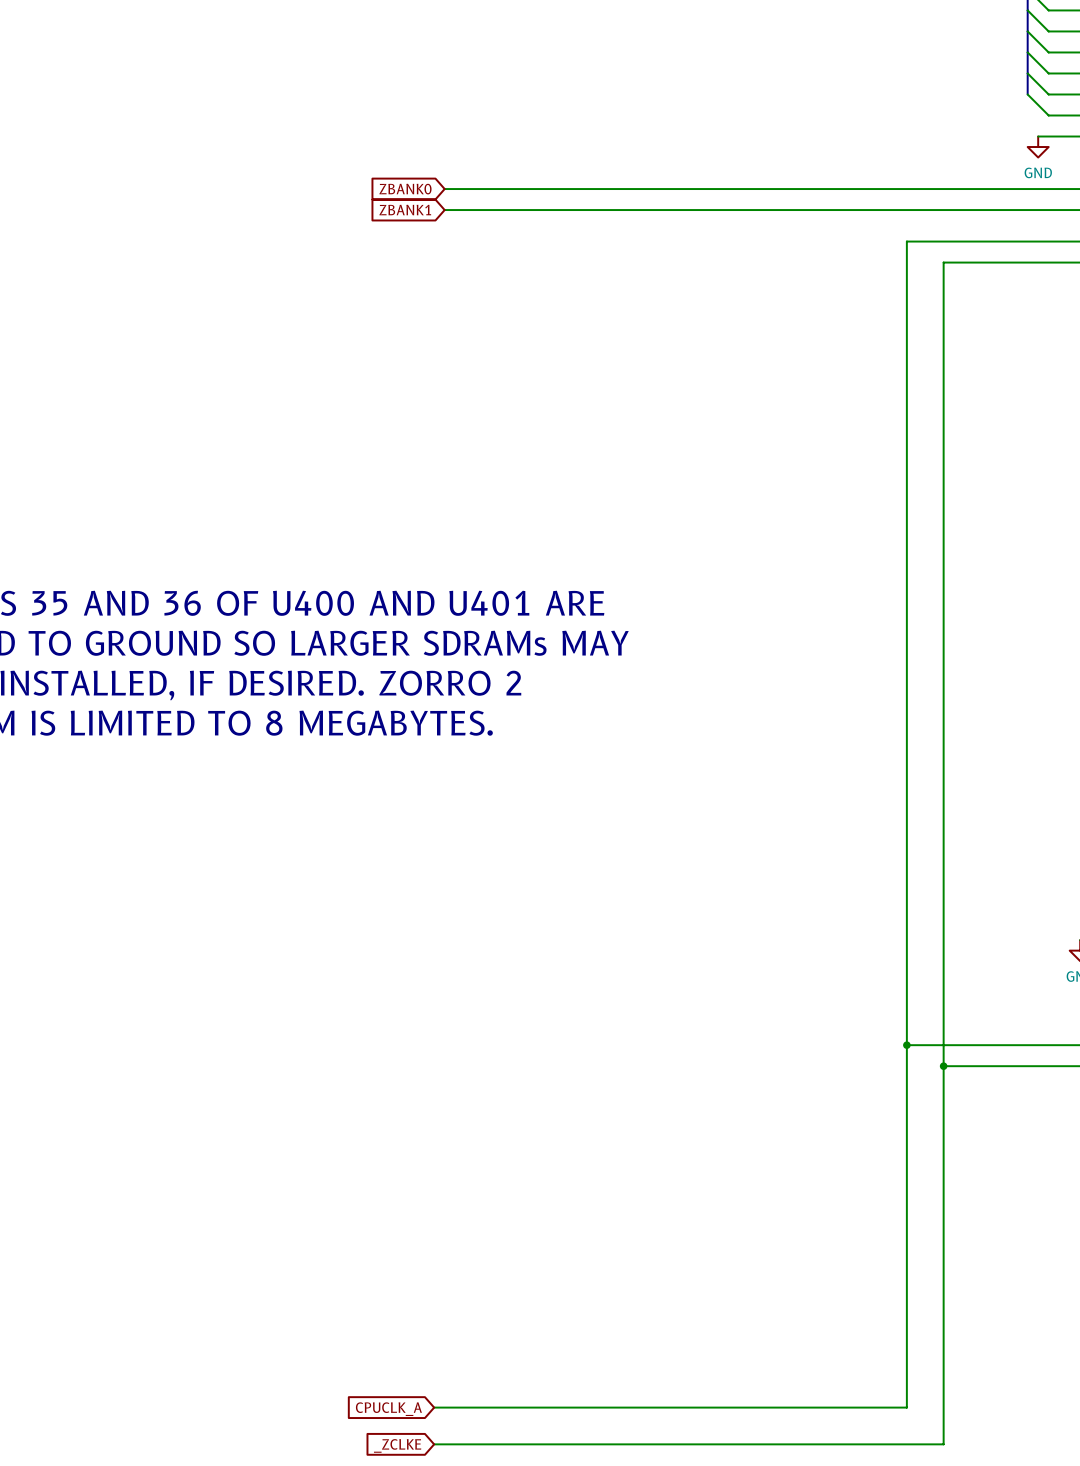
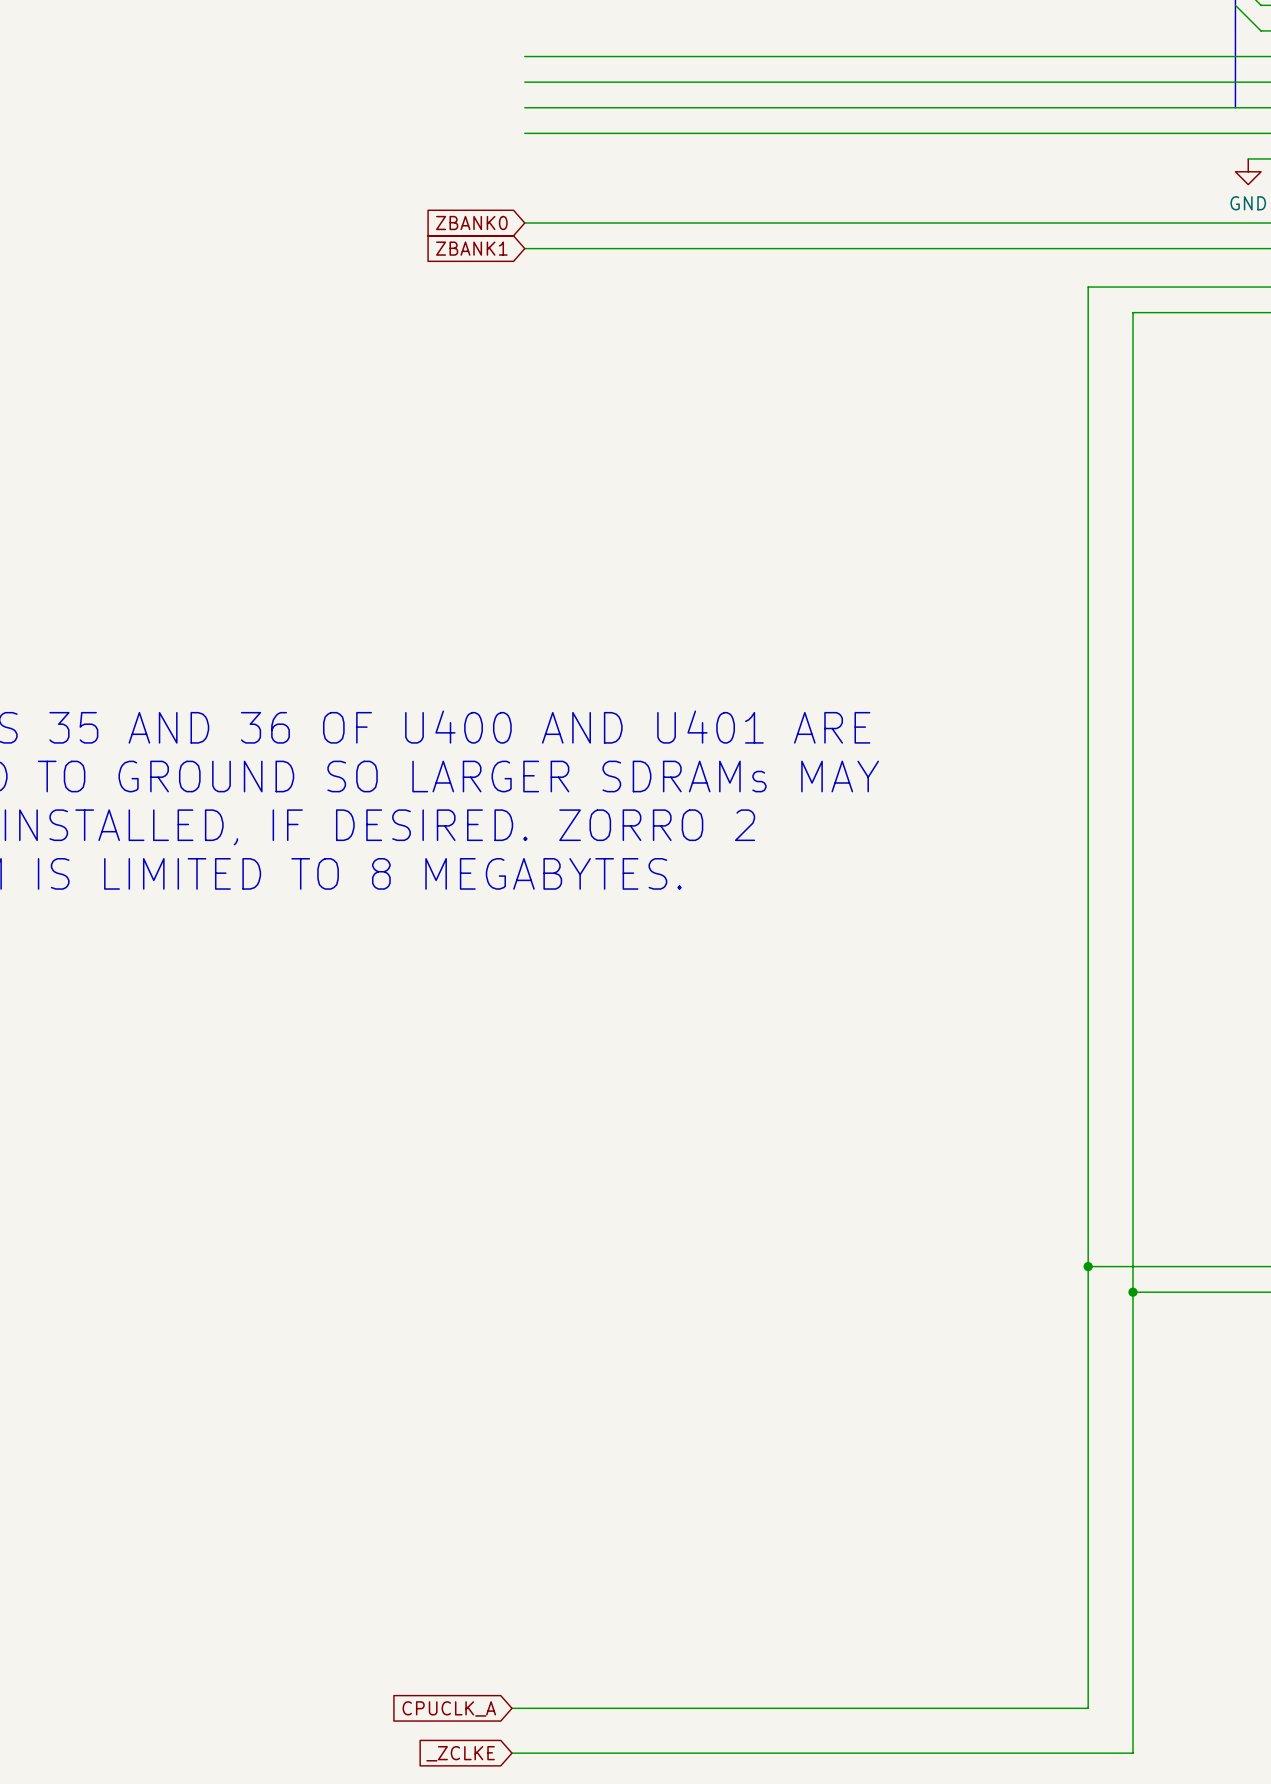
wire: (1027, 31) (1048, 52) -> (524, 56) (1261, 56)
wire: (1027, 52) (1048, 73) -> (524, 82) (1261, 82)
wire: (1027, 73) (1048, 94) -> (524, 107) (1261, 107)
wire: (1027, 94) (1048, 115) -> (524, 133) (1261, 133)

